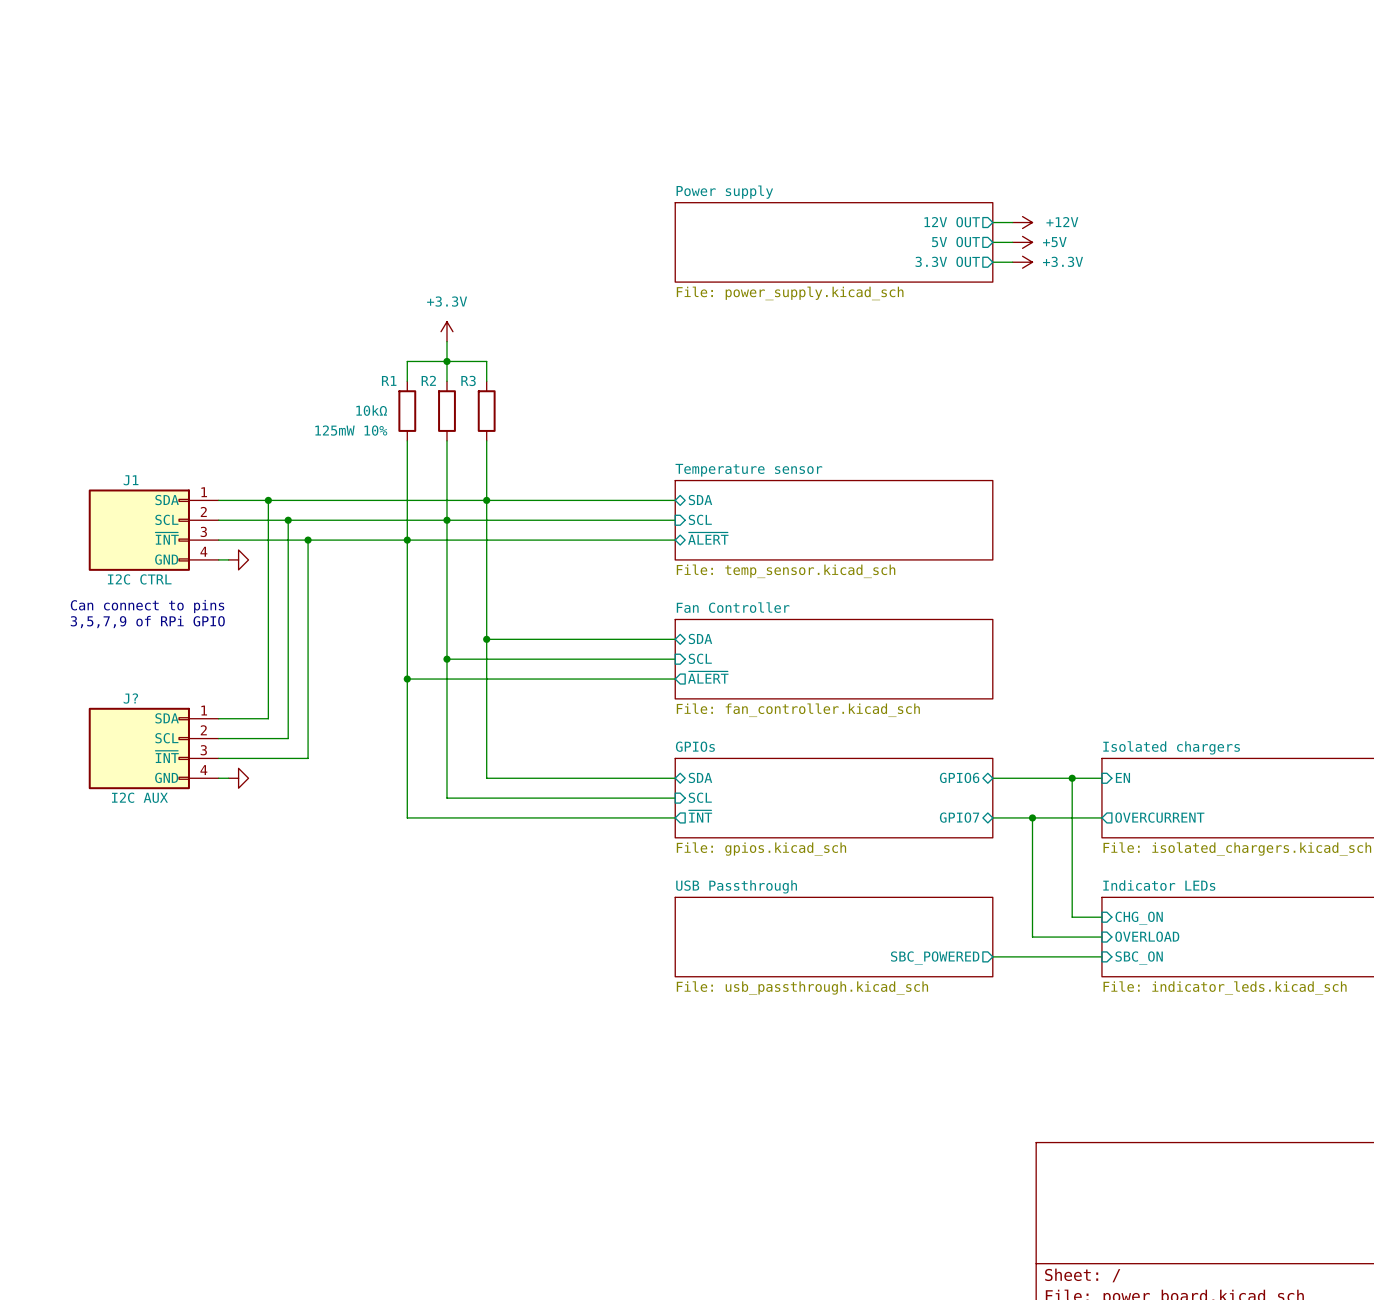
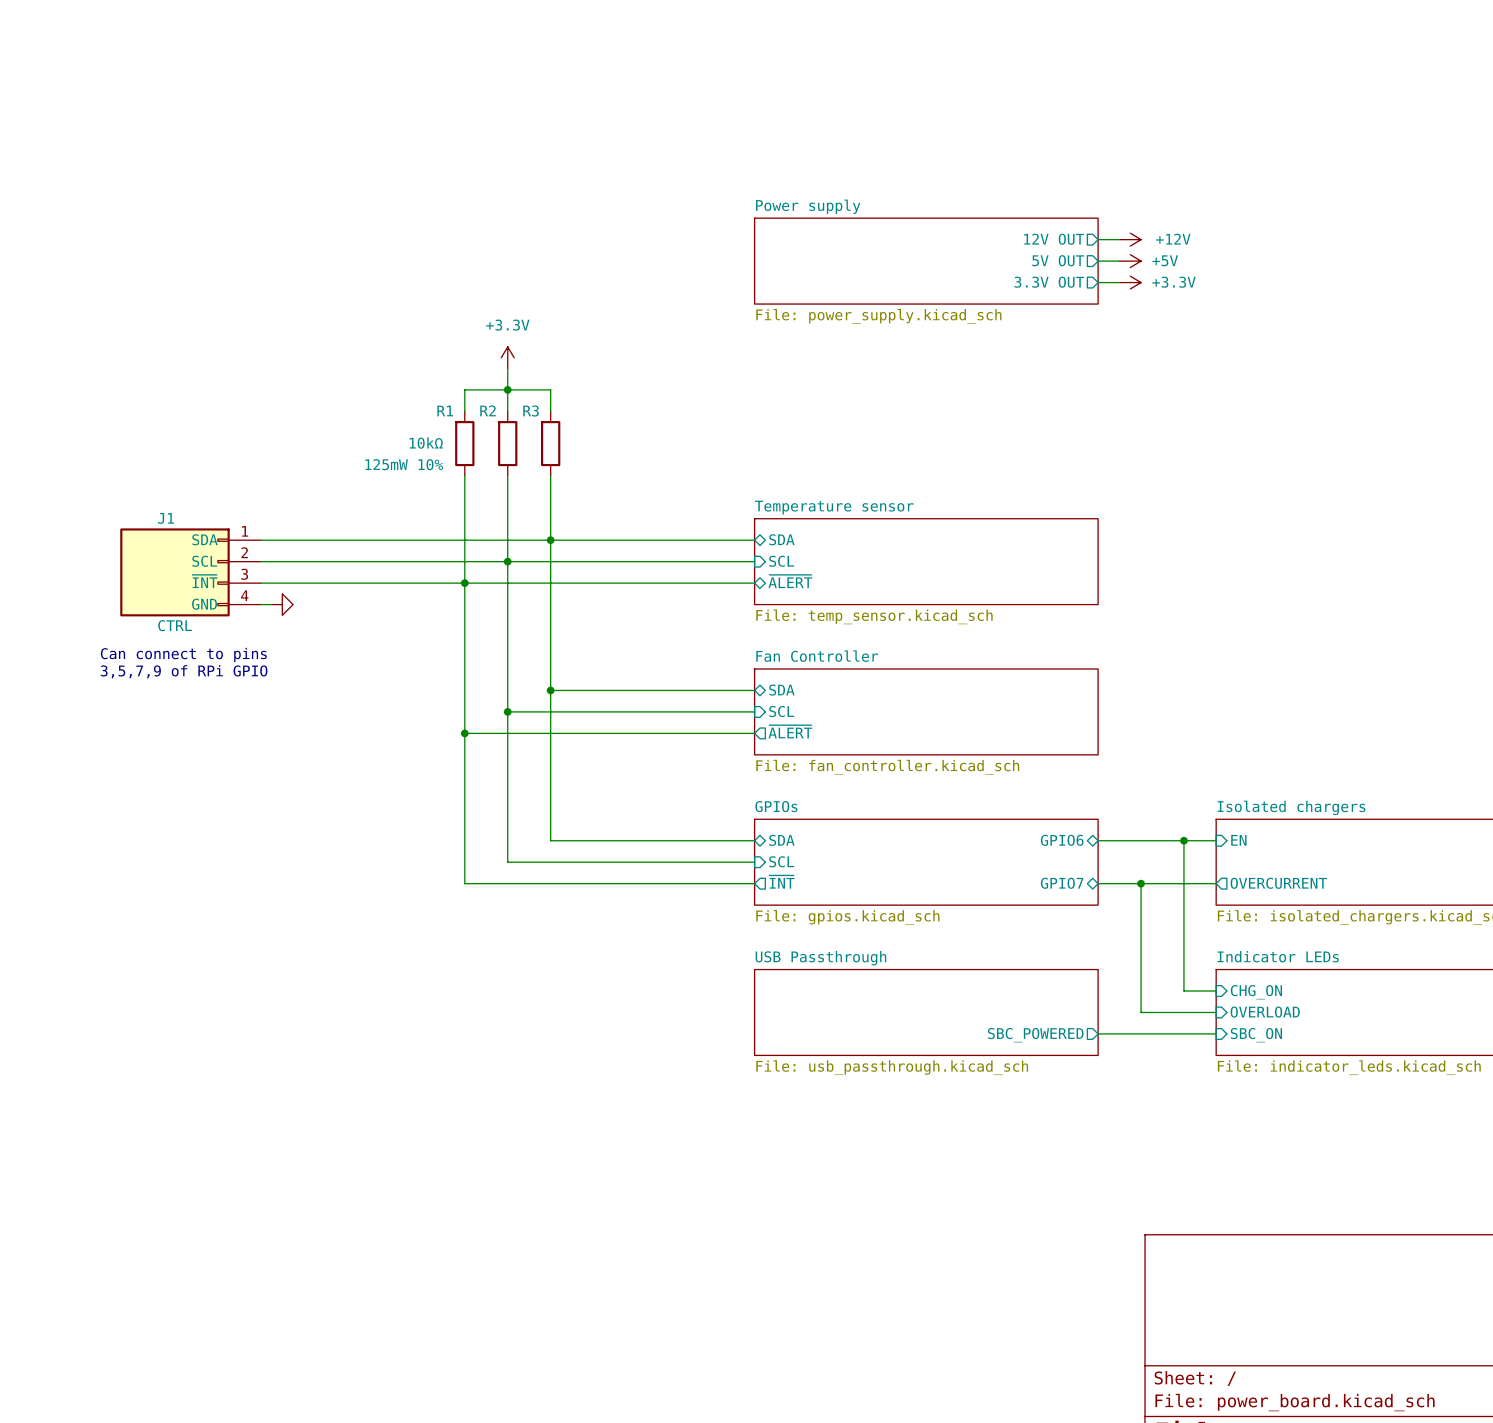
wire: (268, 500) (268, 718) (218, 718) -> none
junction: (268, 500) -> none
wire: (288, 520) (288, 738) (218, 738) -> none
junction: (288, 520) -> none
wire: (308, 540) (308, 758) (218, 758) -> none
junction: (308, 540) -> none
J1 text: I2C CTRL (139, 579) -> CTRL (175, 625)
J?: (153, 748) -> none
wire: (218, 778) (228, 778) -> none
power symbol: (238, 778) -> none

